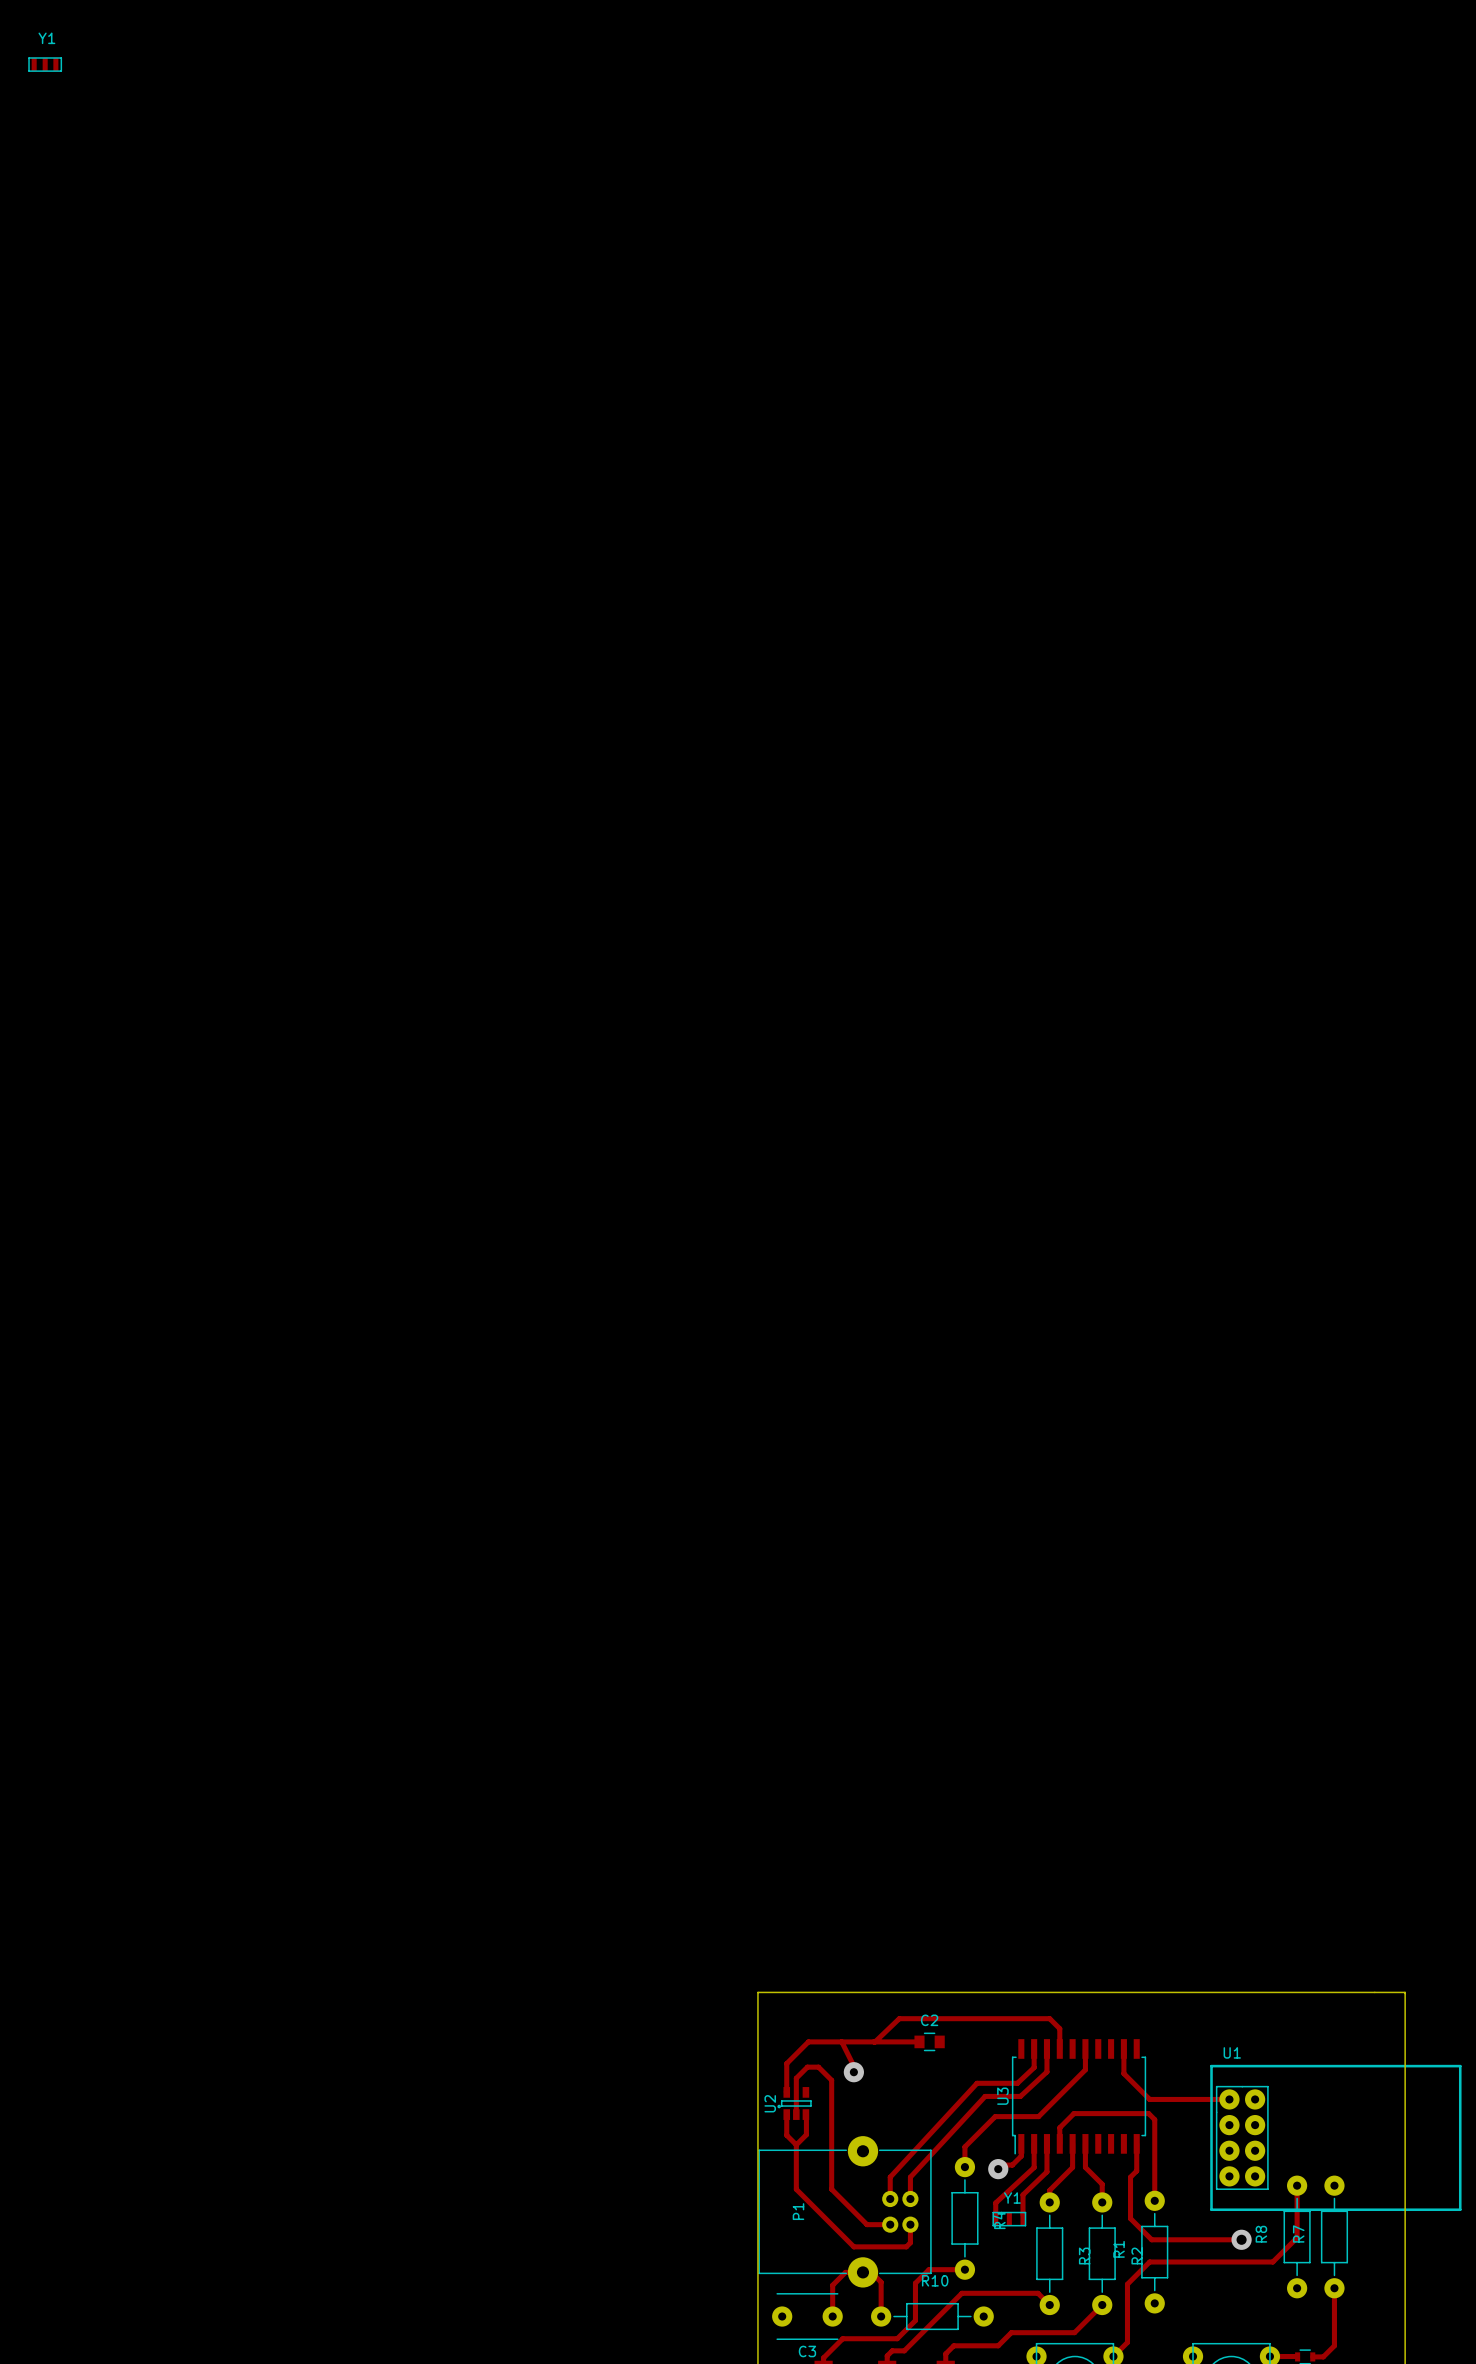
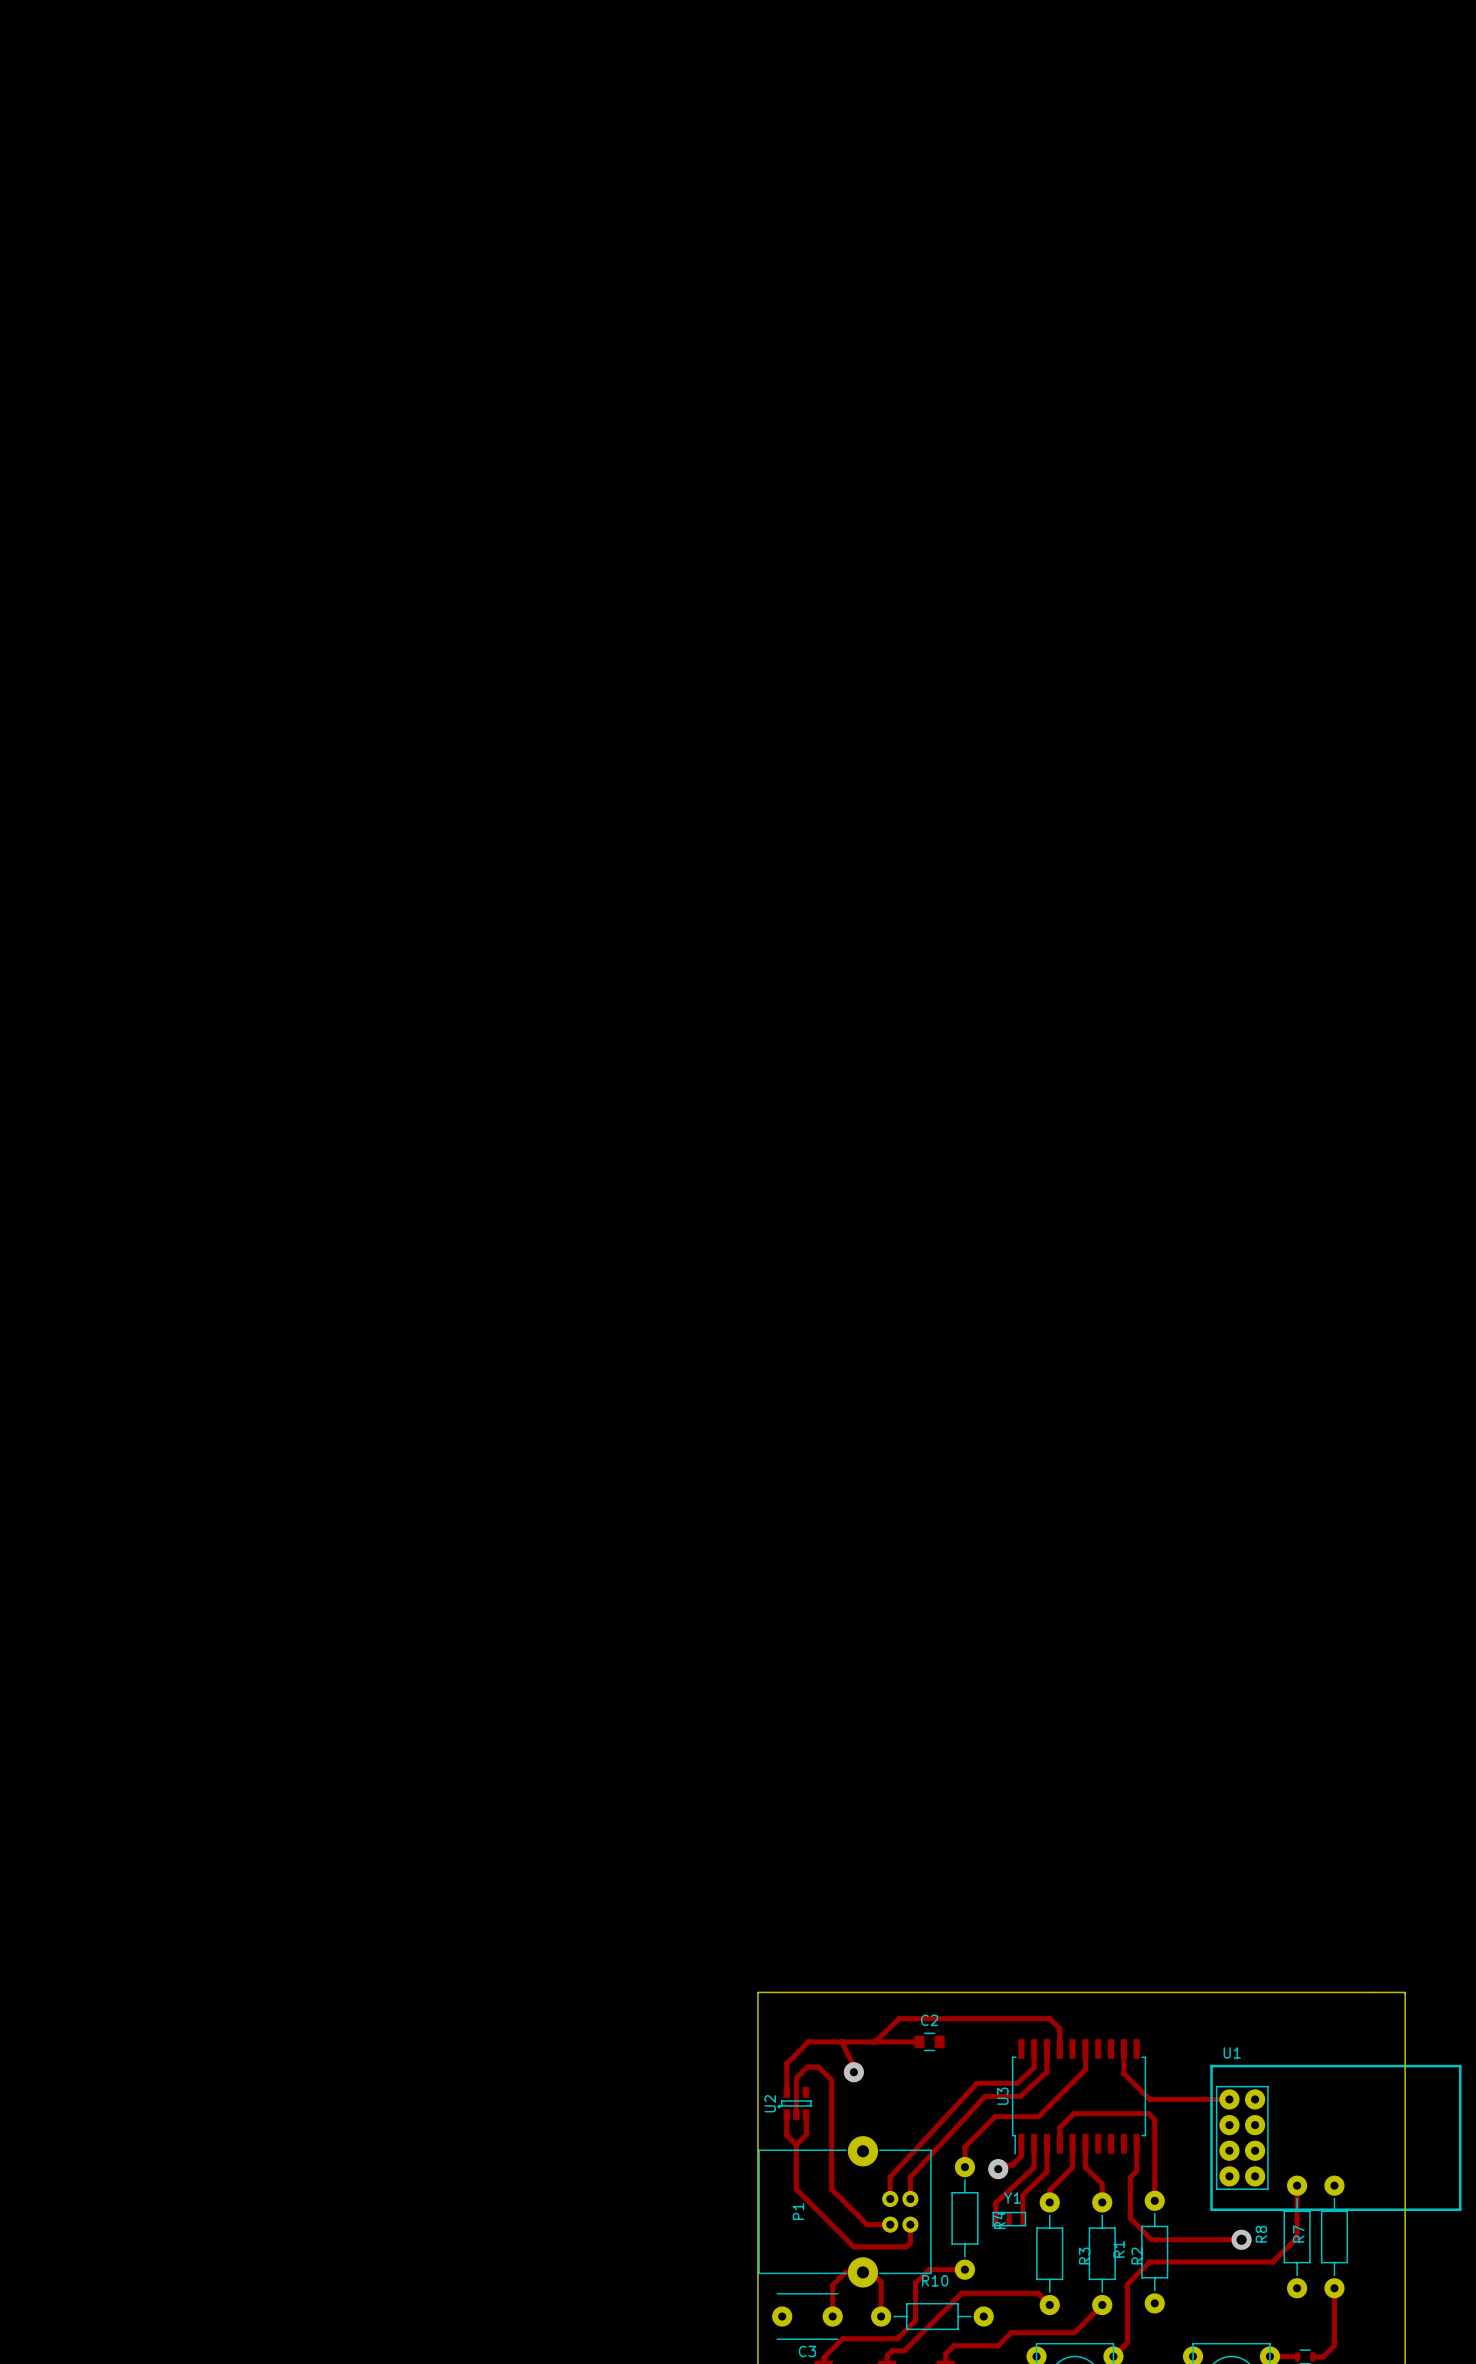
Y1: (45, 64) -> none

